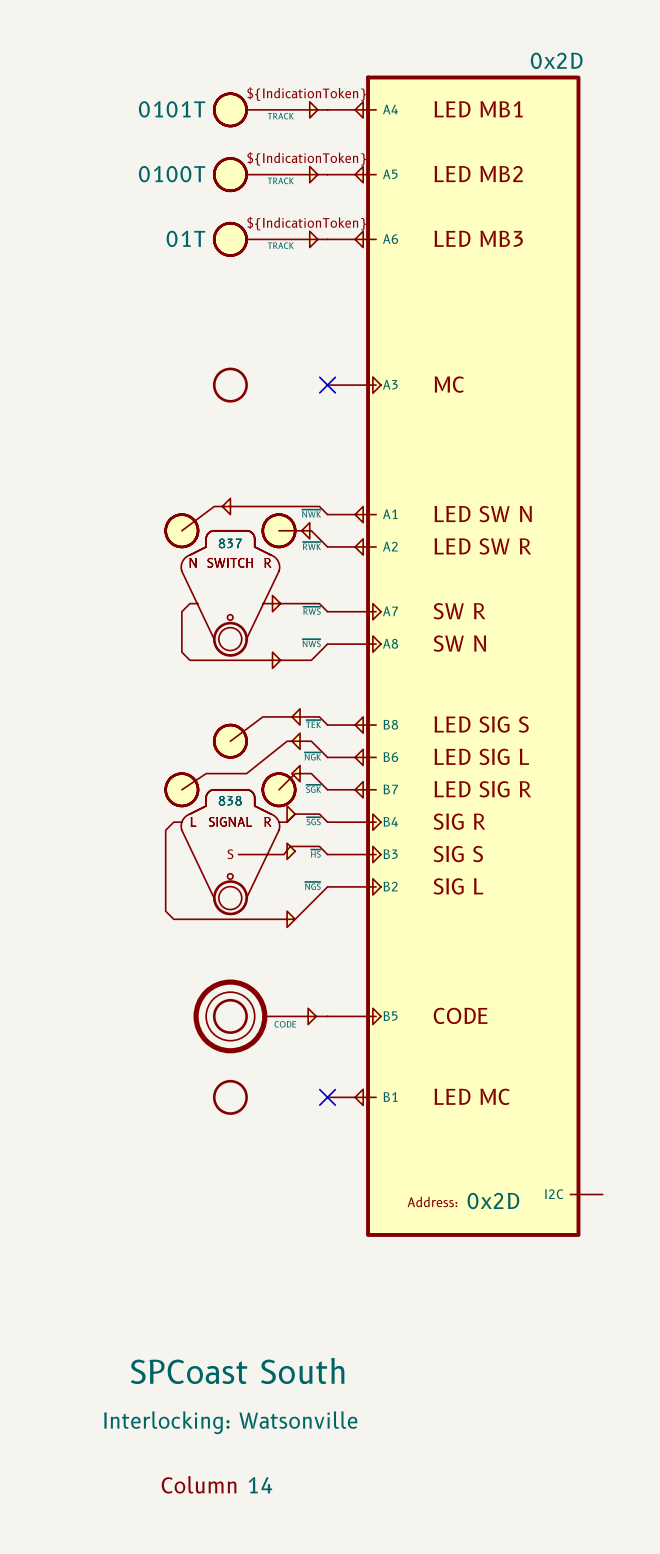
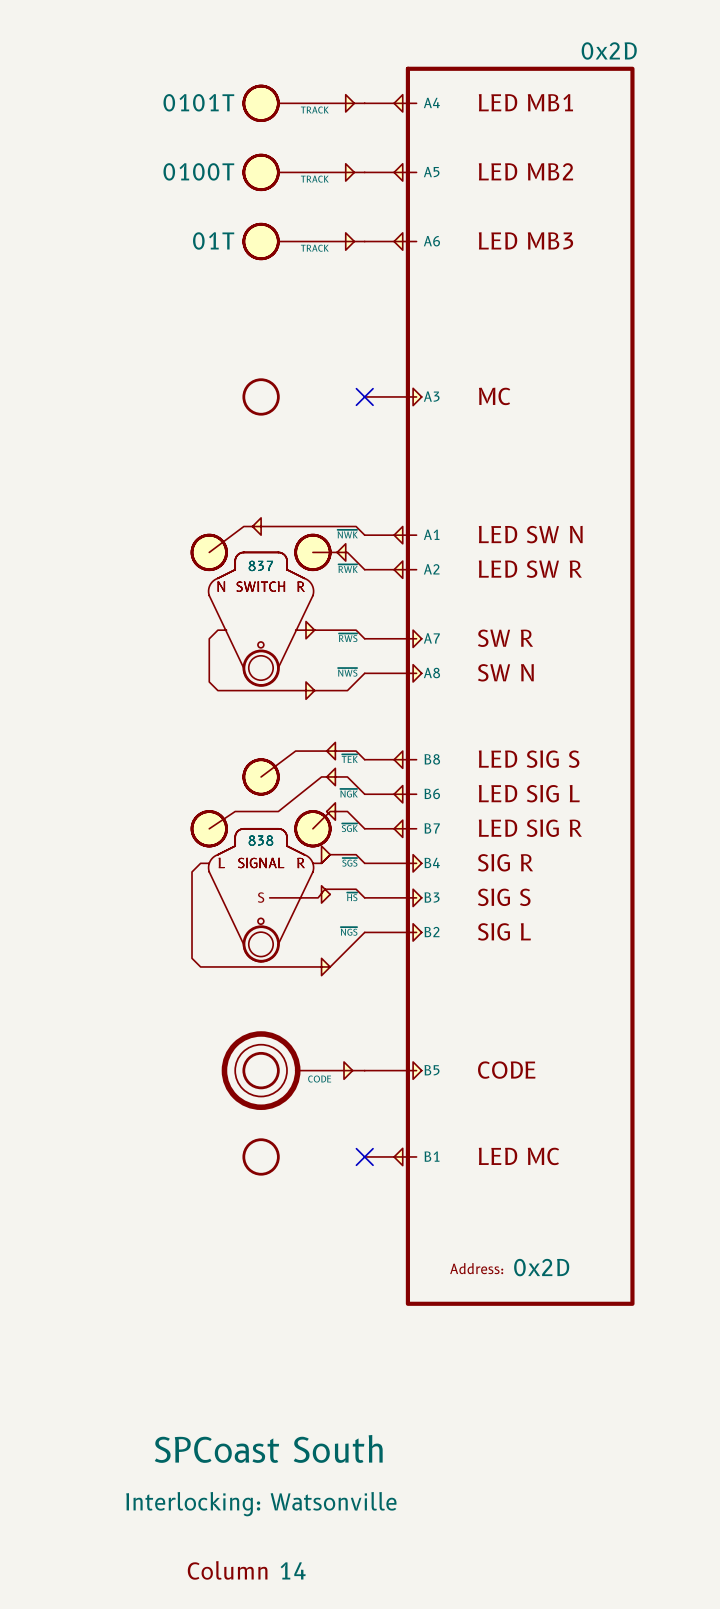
part symbol: [327, 75, 603, 1237] -> [364, 66, 635, 1306]
part text: ${IndicationToken} (306, 94) -> none
part text: ${IndicationToken} (306, 158) -> none
part text: ${IndicationToken} (306, 223) -> none

